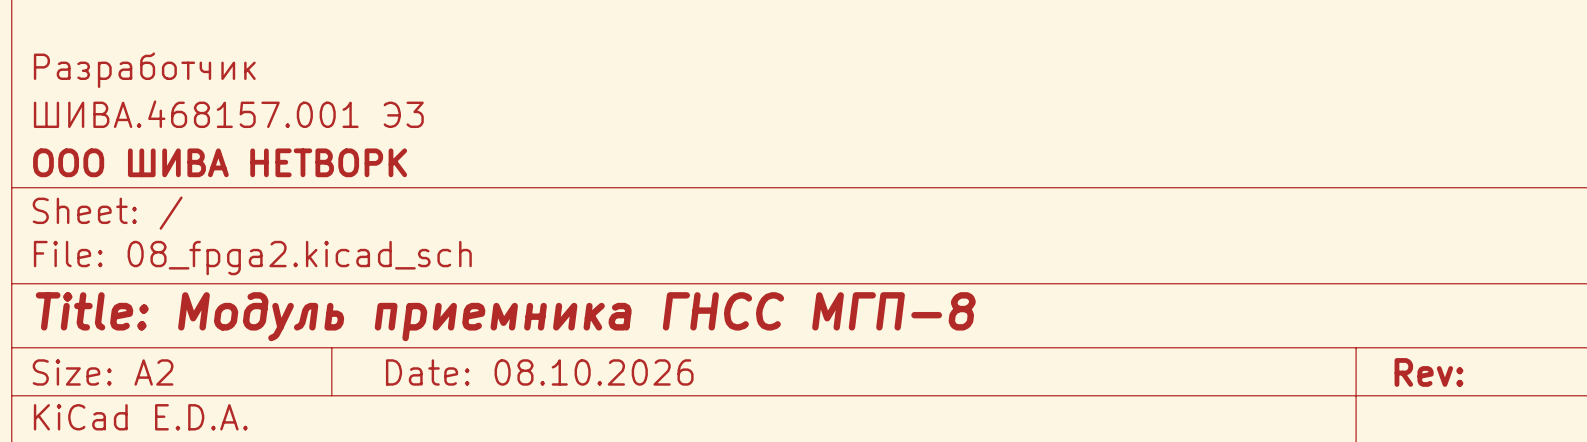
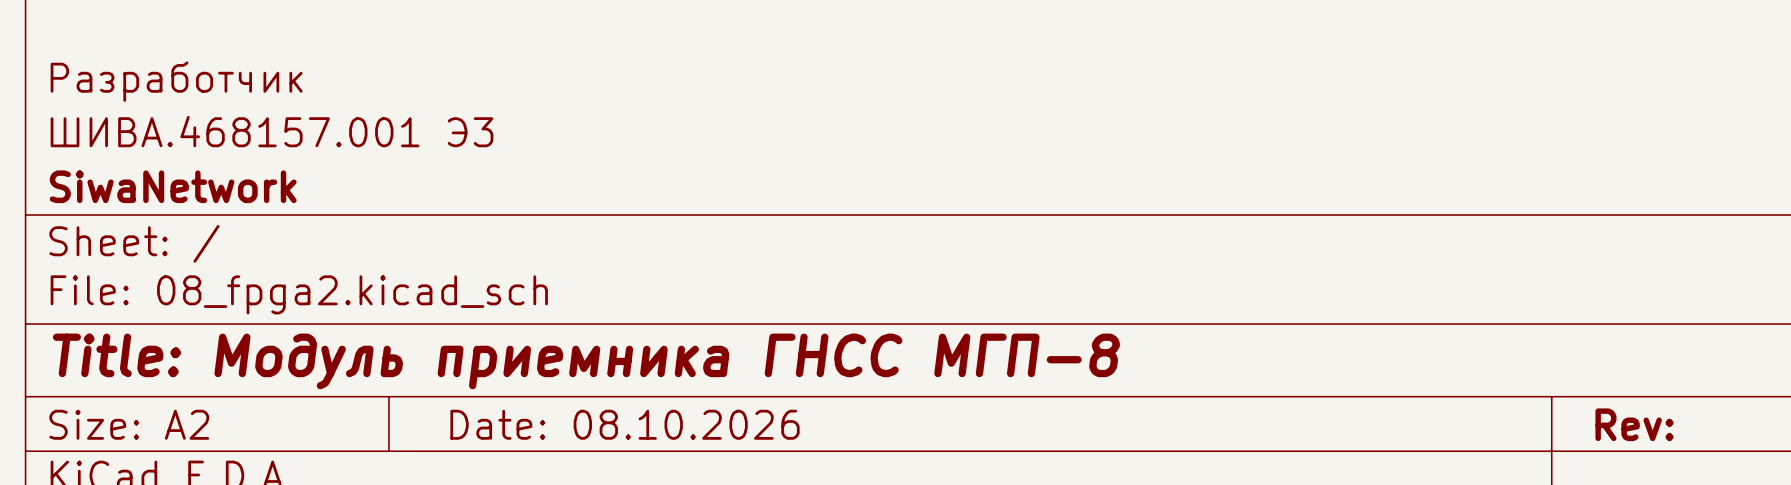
title block: ООО ШИВА НЕТВОРК (220, 162) -> SiwaNetwork (173, 186)

